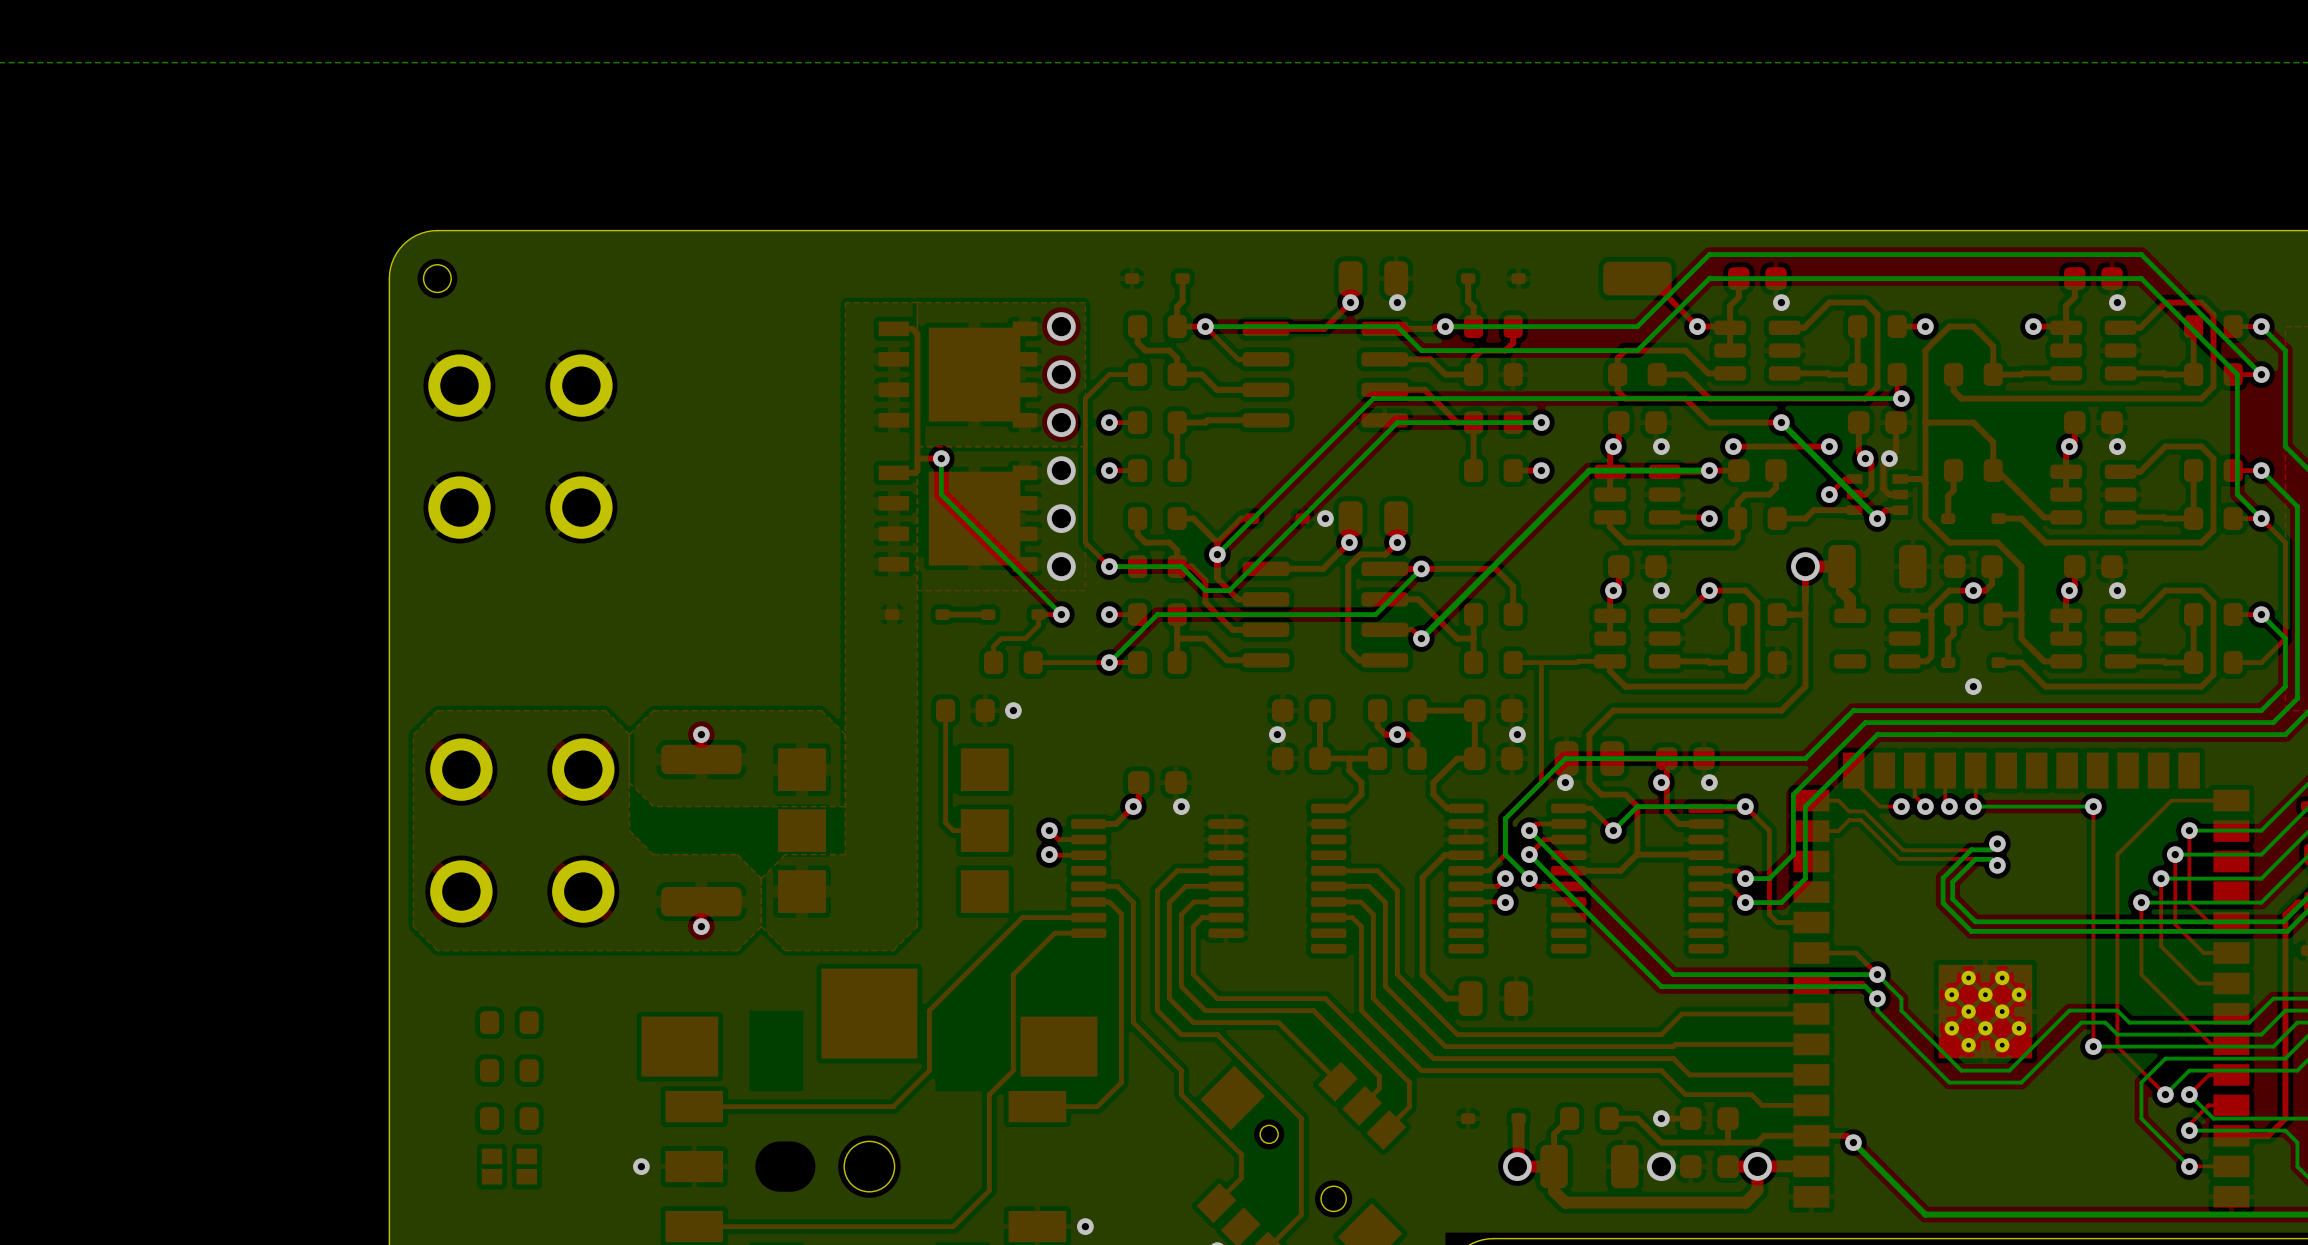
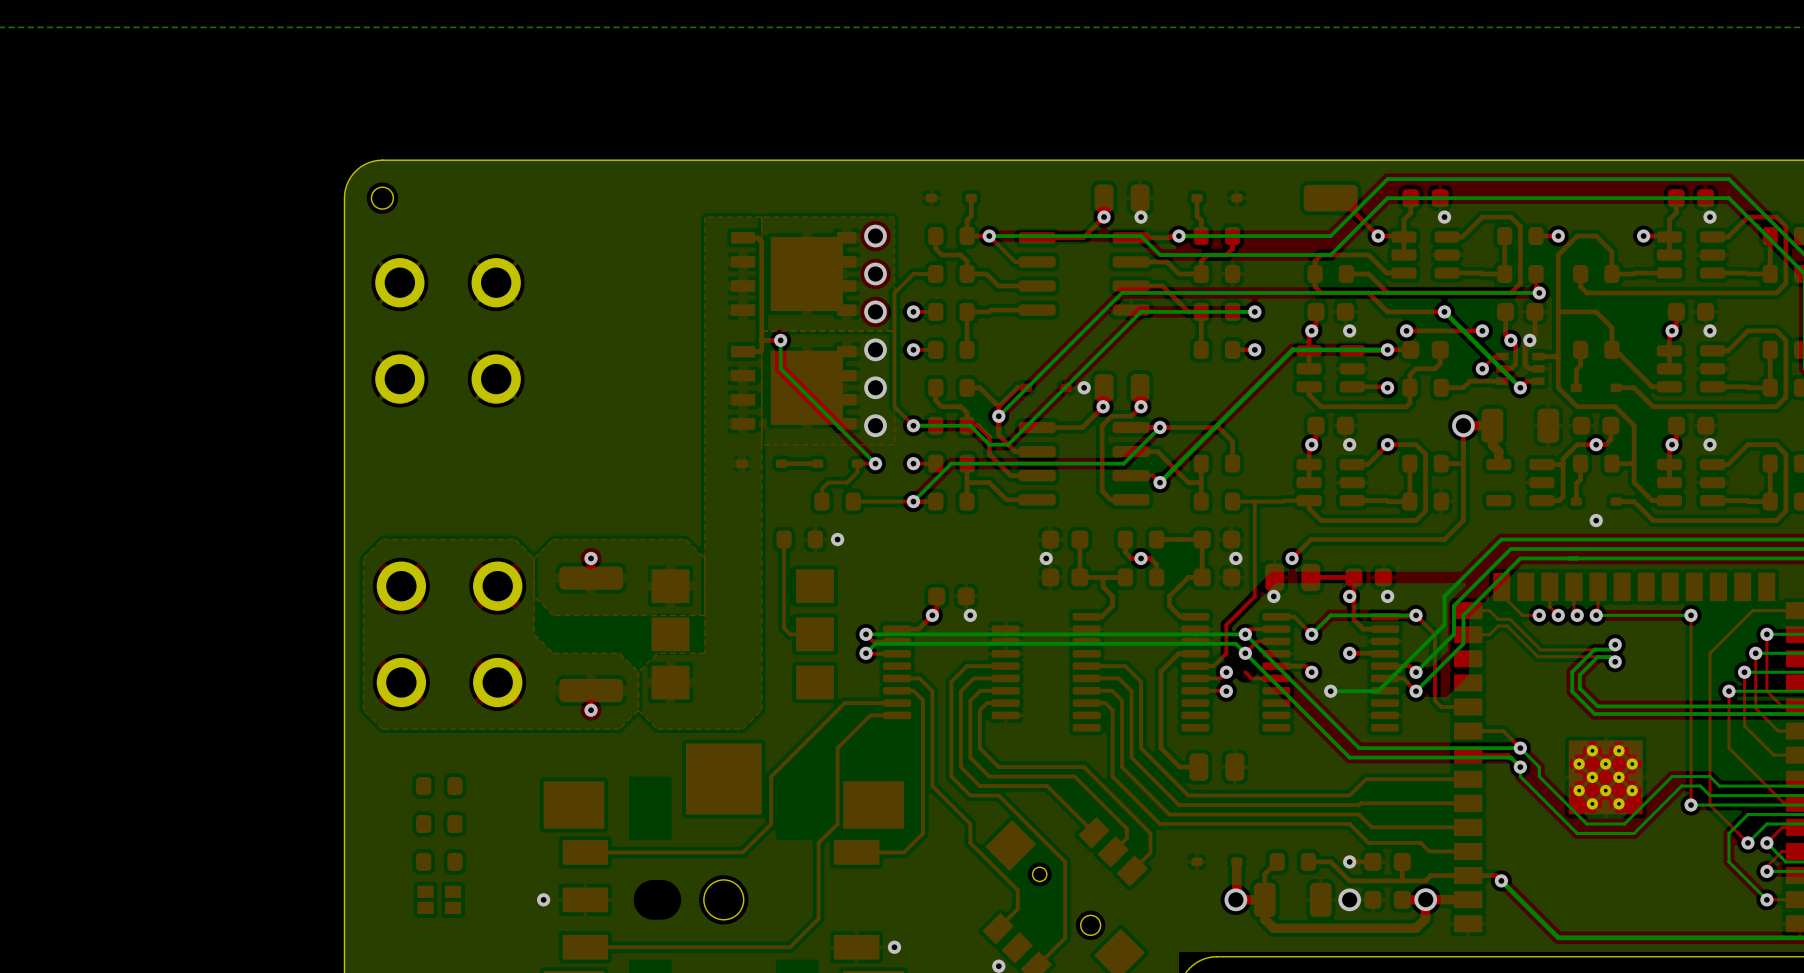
top track: (1613, 710) (1589, 734) (1589, 782) (1601, 794) (1625, 794) (1637, 806) (1637, 854) (1620, 870) (1605, 870) -> (1311, 539) (1292, 558)
via: none -> (1292, 558)
bottom track: (1805, 758) (1565, 758) (1505, 818) (1505, 854) (1529, 878) -> (1463, 577) (1444, 596) (1444, 624) (1378, 691) (1330, 691)
bottom track: none -> (1245, 634) (866, 634)
bottom track: (1793, 830) (1793, 854) -> (1463, 643) (1453, 653)
bottom track: none -> (1453, 634) (1416, 672)
bottom track: (1805, 842) (1805, 878) (1781, 902) (1745, 902) -> none
bottom track: none -> (1245, 653) (1235, 643) (875, 643) (866, 653)
top track: (1661, 854) (1638, 854) -> none
via: none -> (1349, 653)
via: (1529, 878) -> none
via: none -> (1311, 672)
bottom track: (1769, 878) (1745, 878) -> (1435, 672) (1416, 691)
via: none -> (1330, 691)

